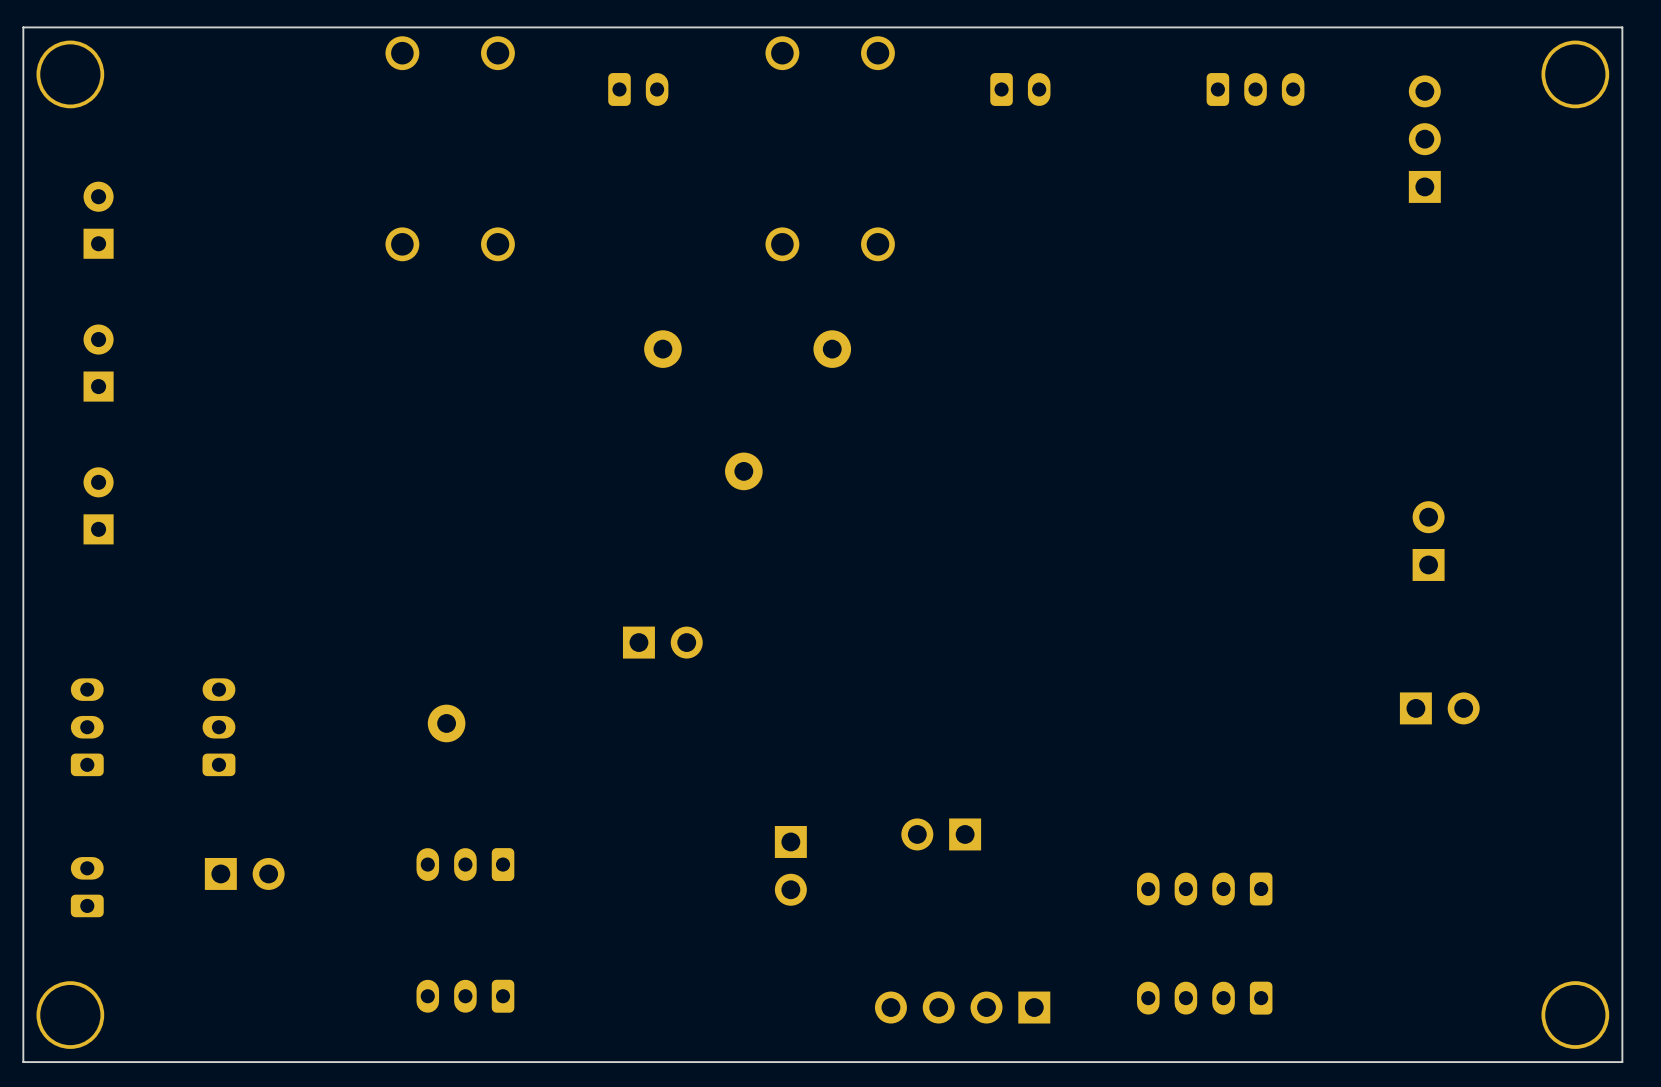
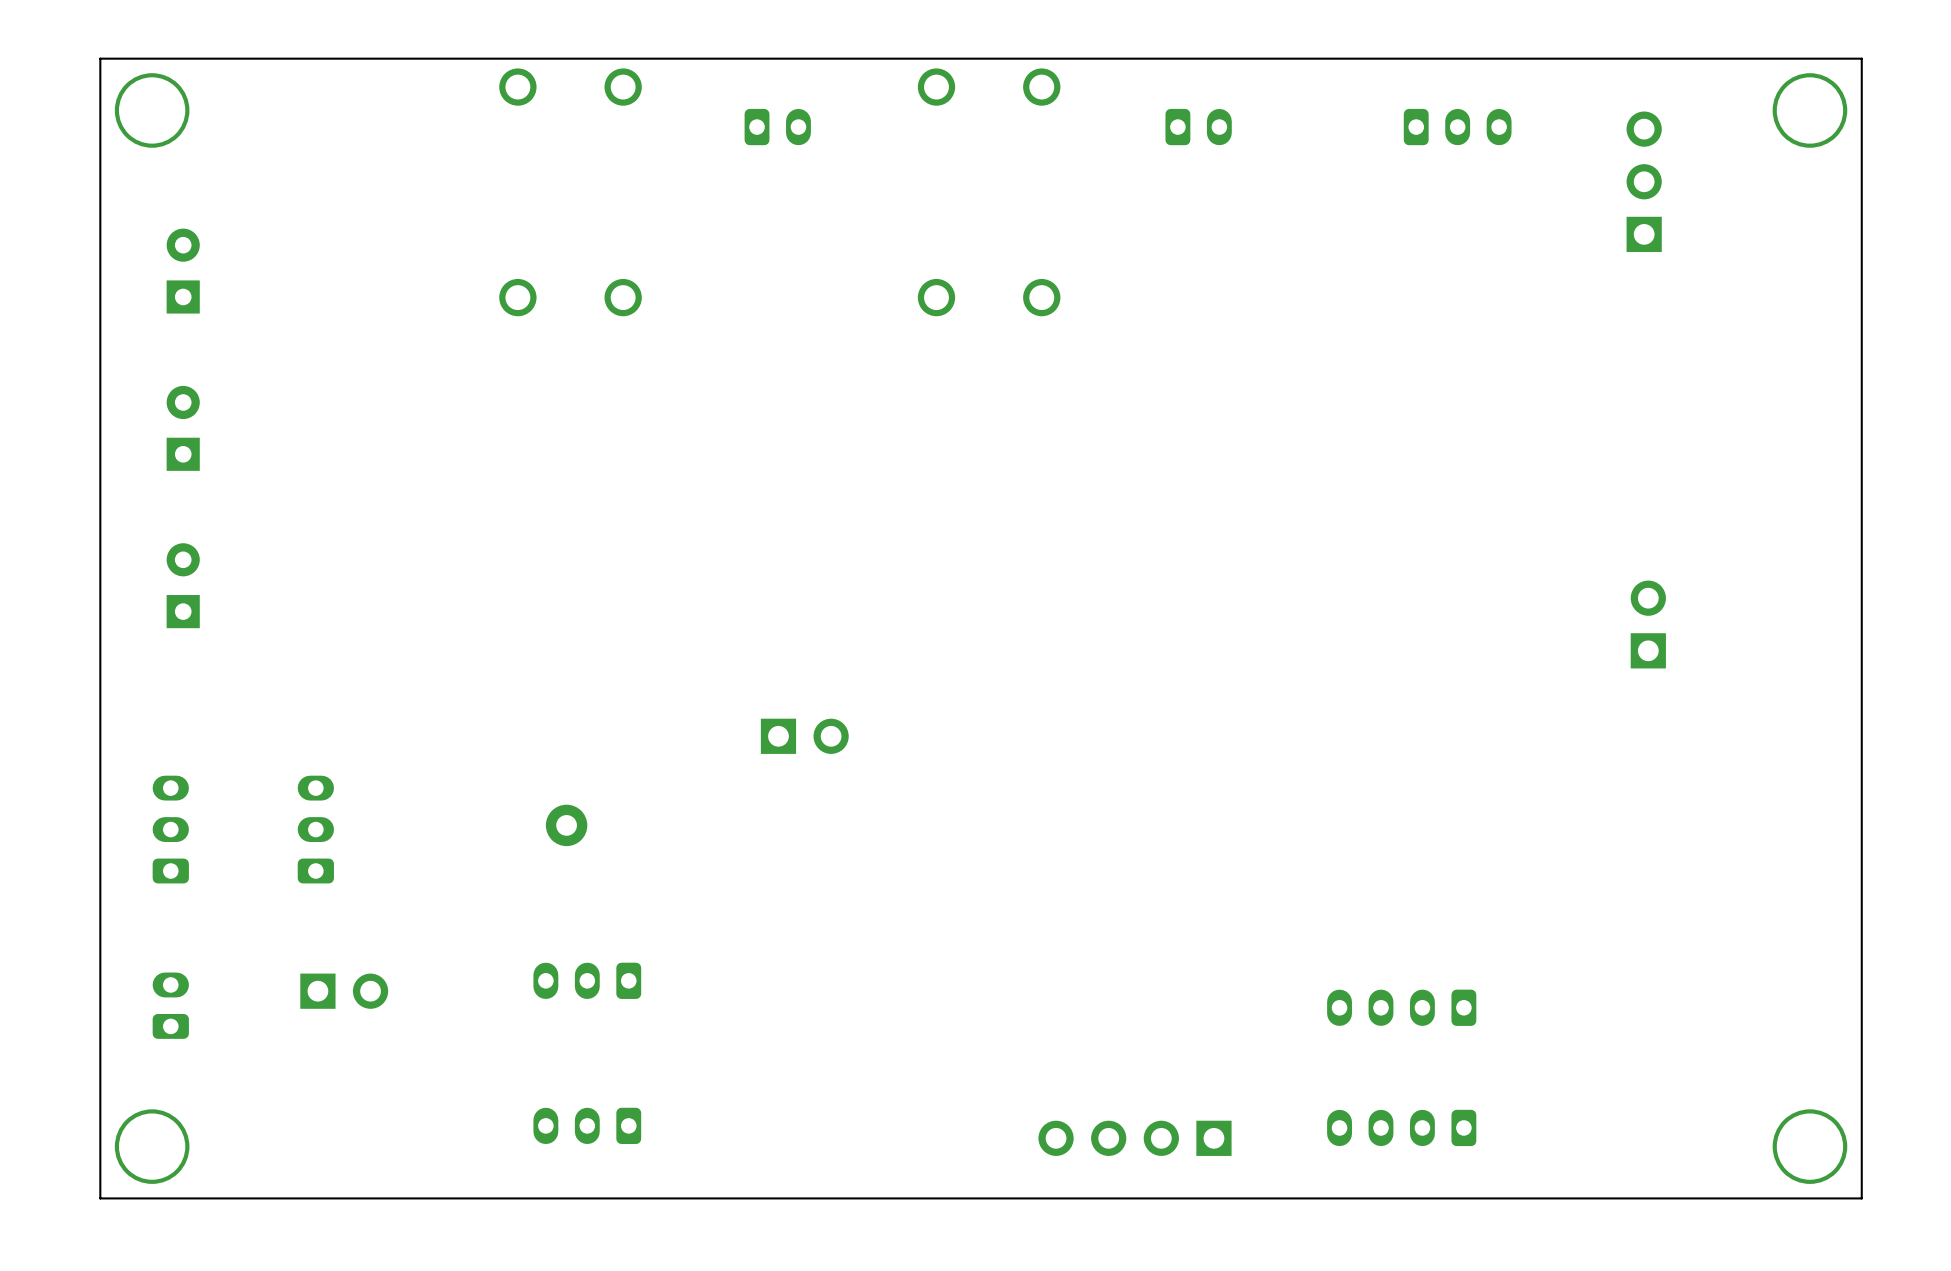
part: (662, 349) -> none
part: (832, 349) -> none
part: (743, 471) -> none
part: (1439, 708) -> none
part: (941, 834) -> none
part: (790, 865) -> none

